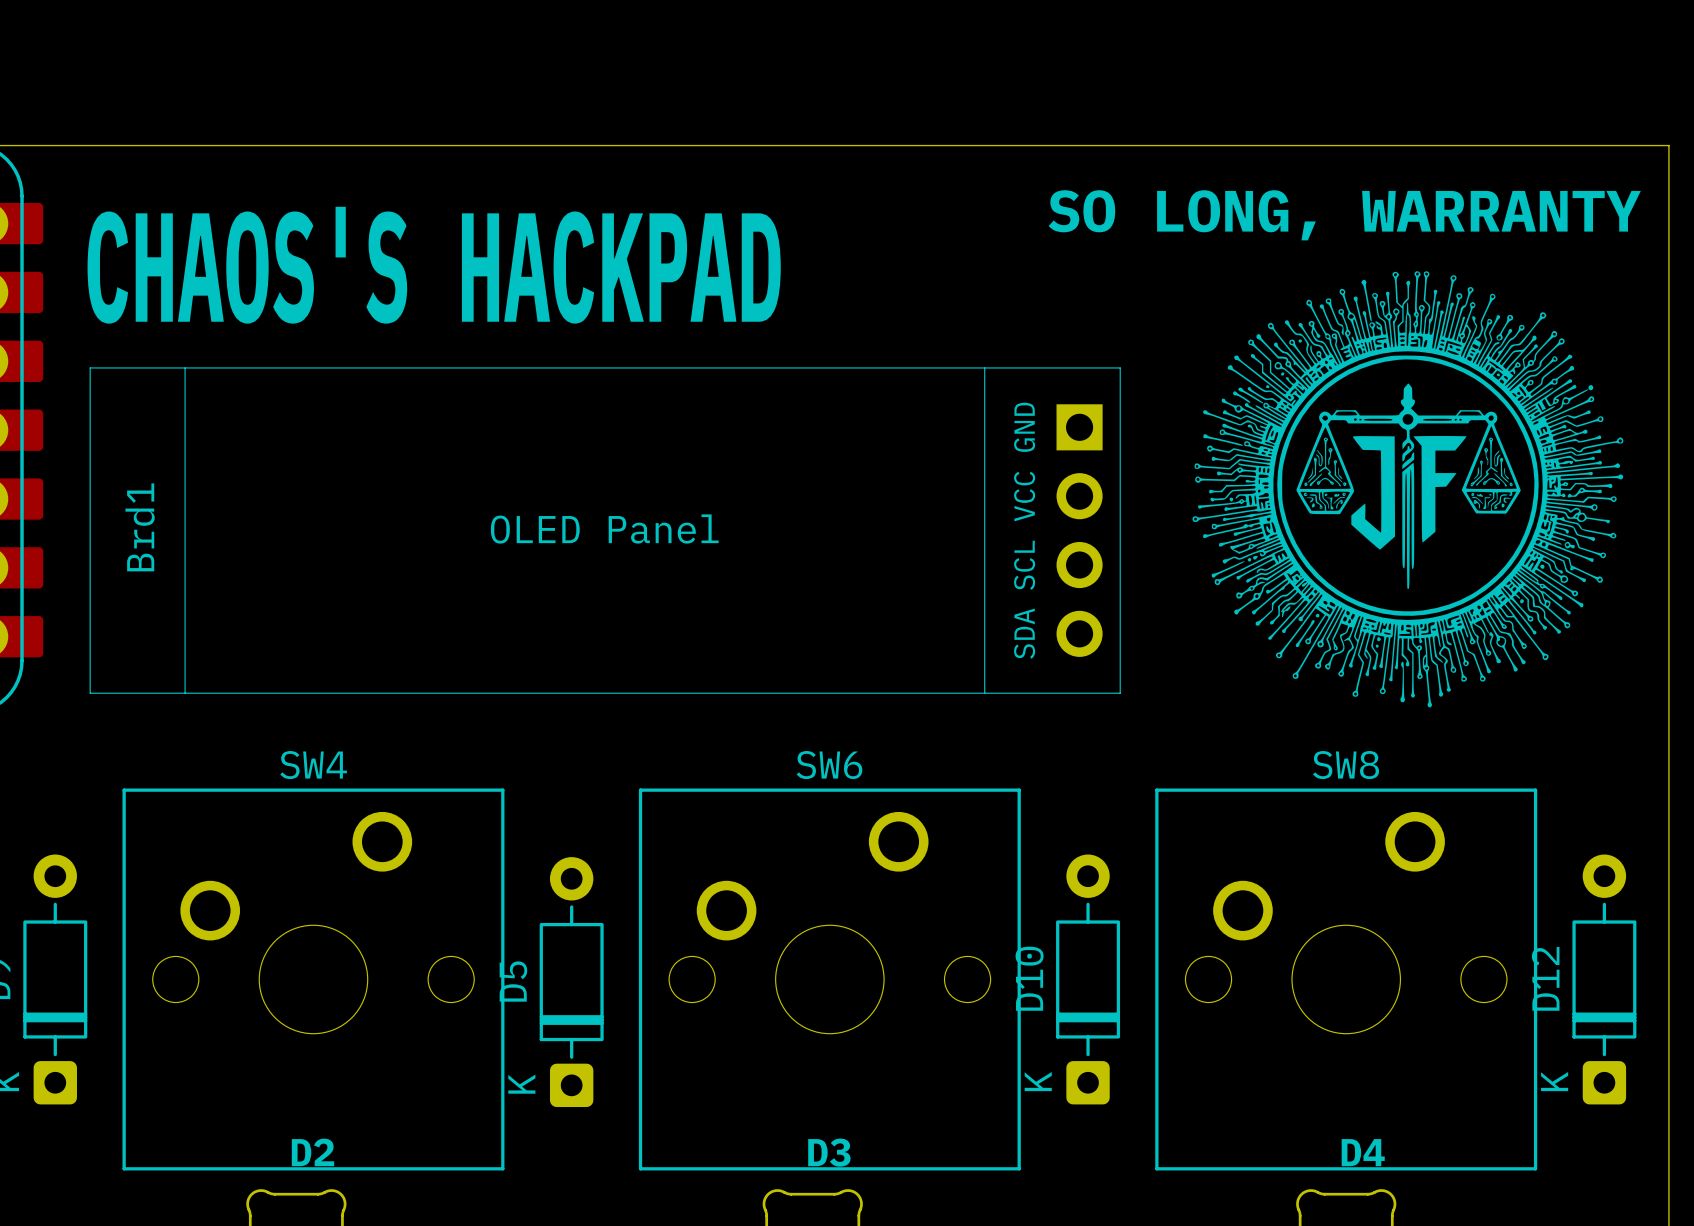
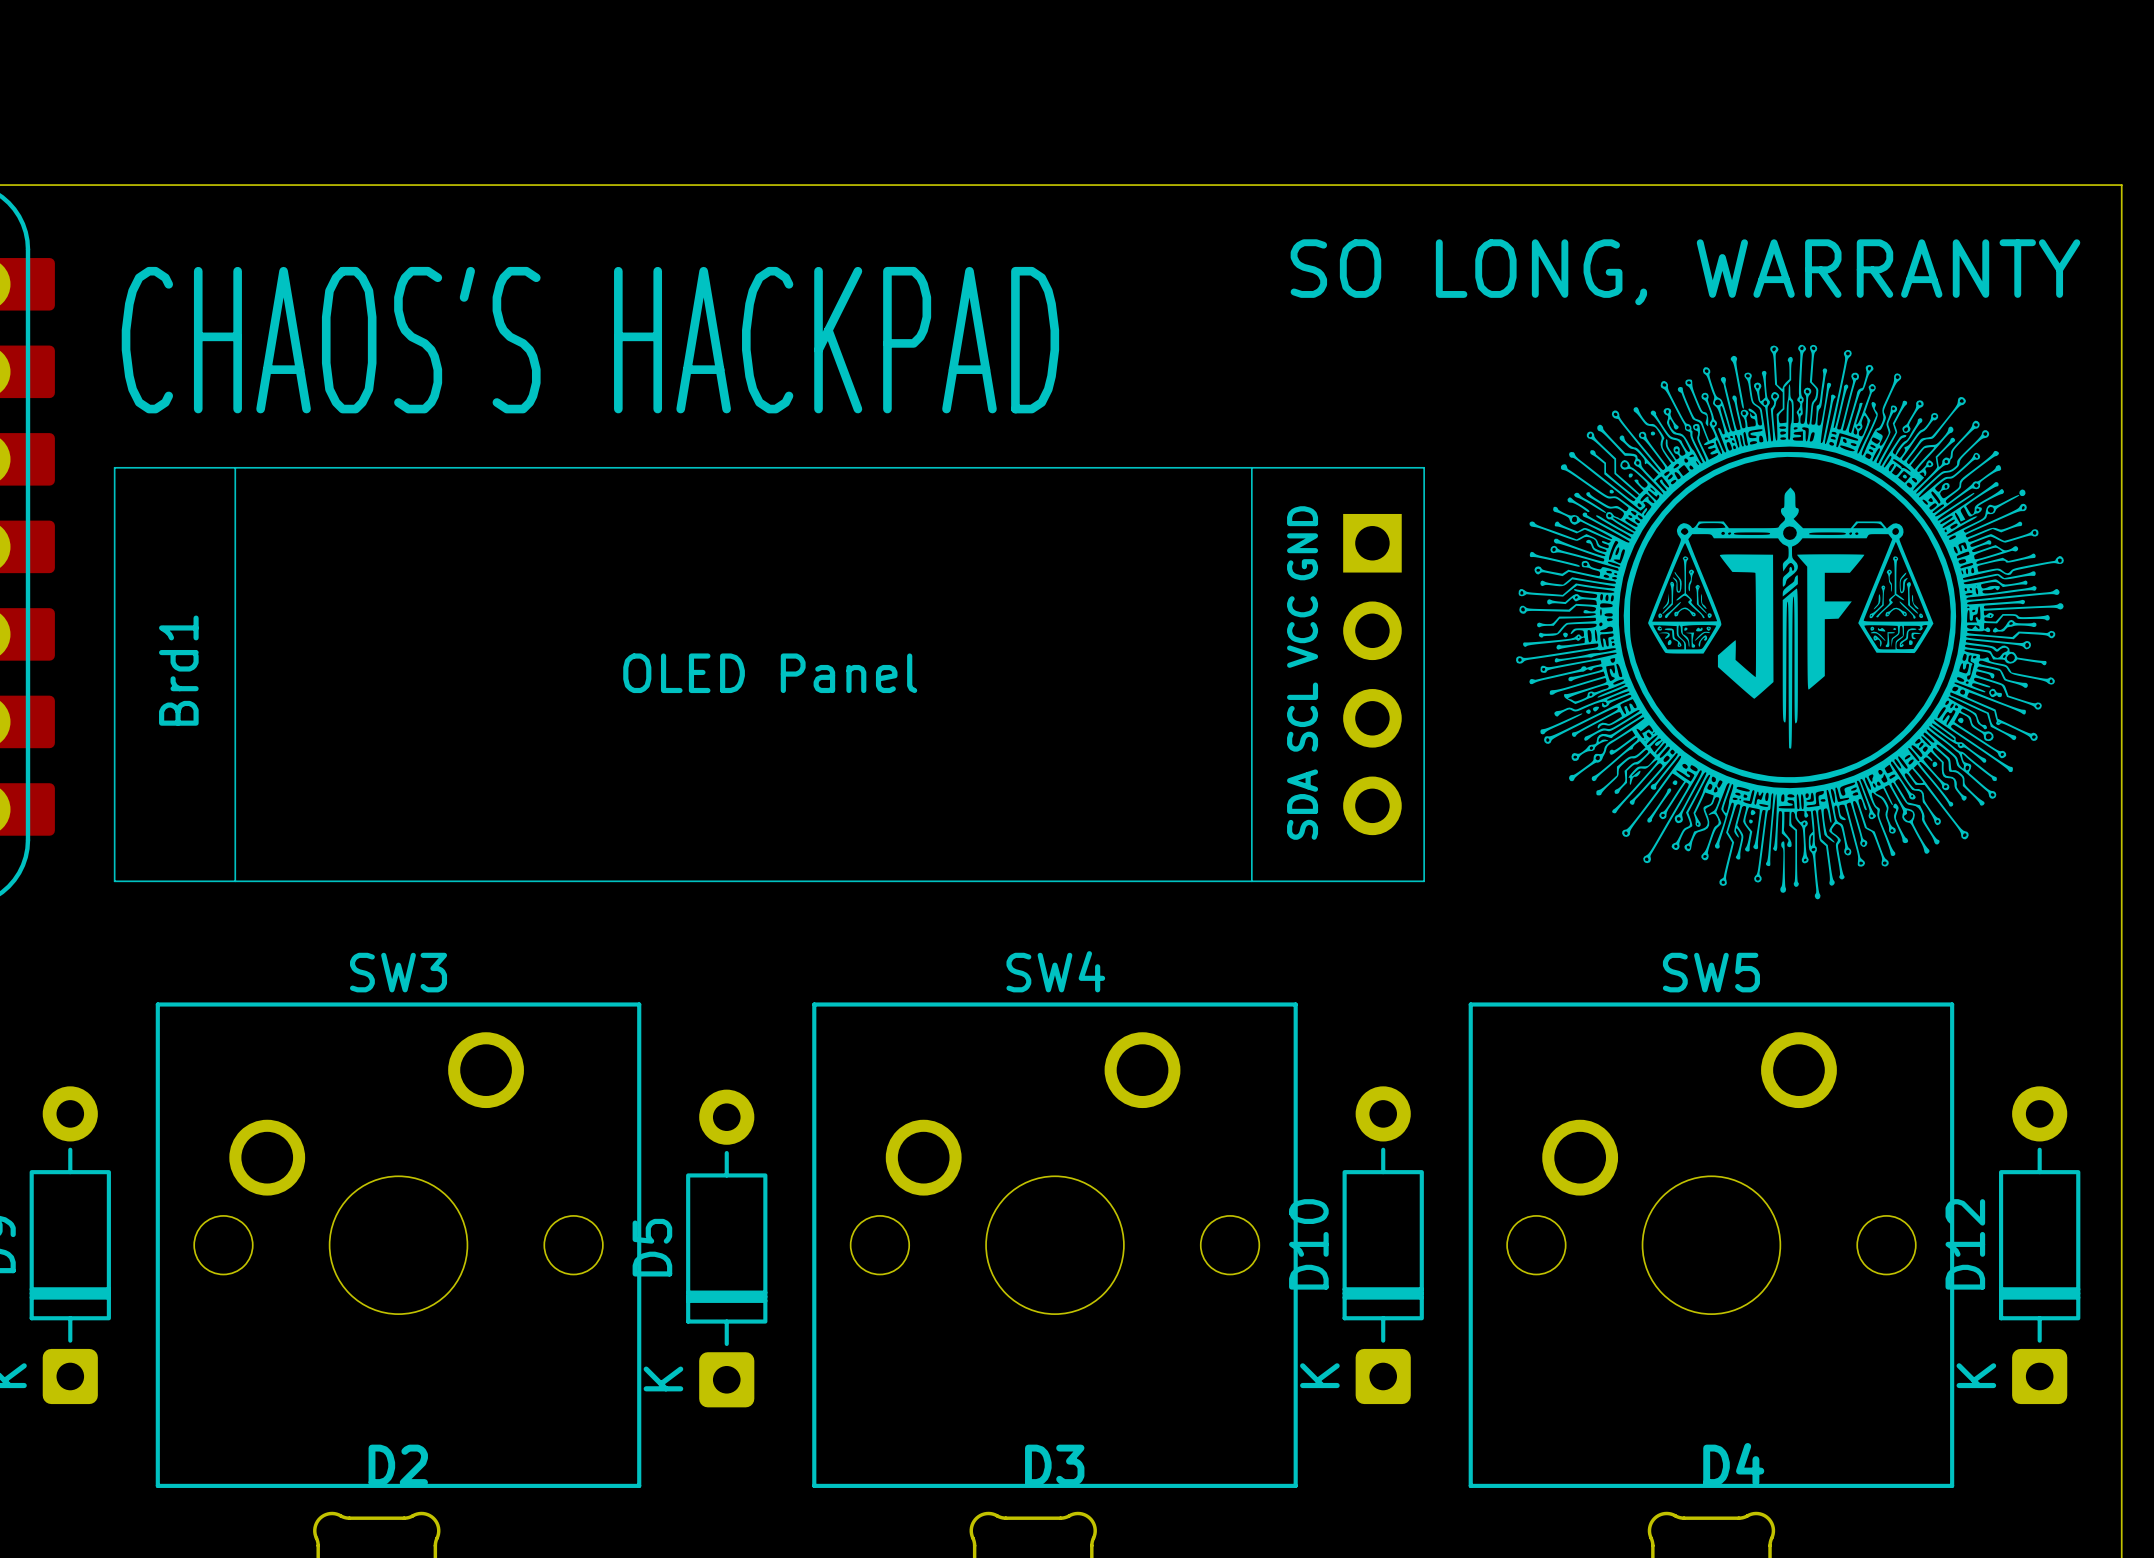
SW4 name: SW4 (313, 765) -> SW3 (398, 972)
SW6 name: SW6 (829, 765) -> SW4 (1055, 971)
SW8 name: SW8 (1346, 765) -> SW5 (1711, 972)

